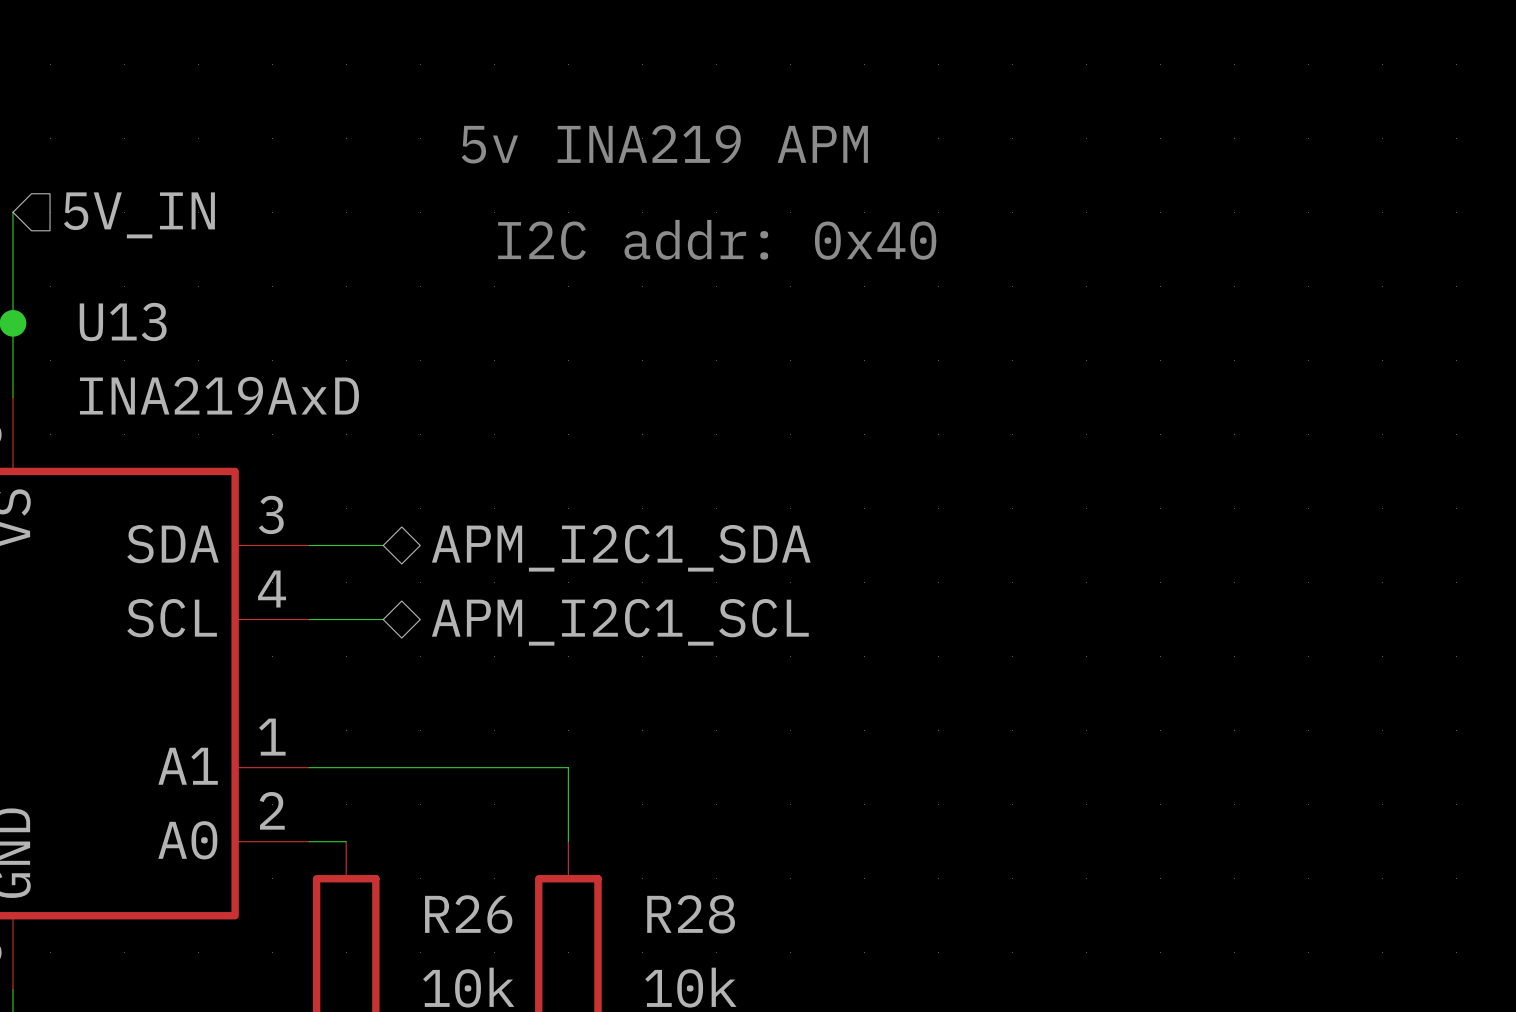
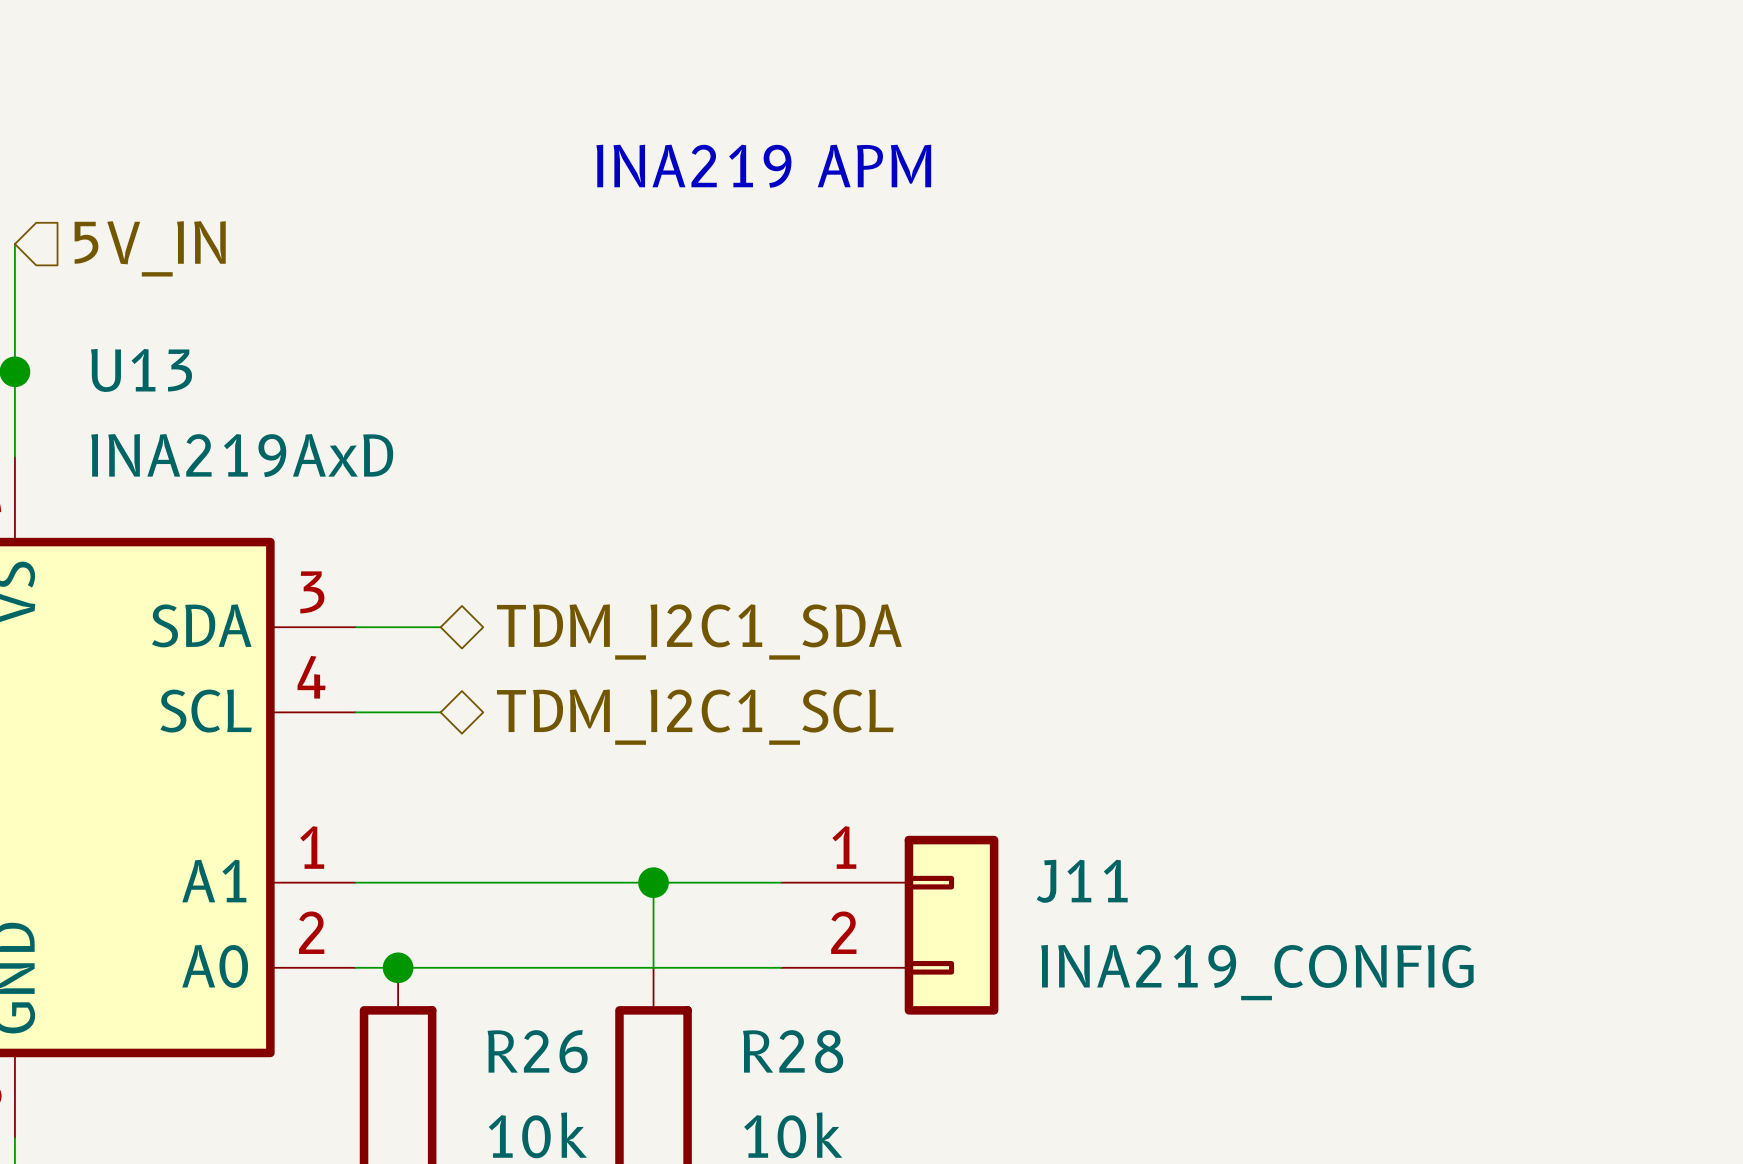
text: 5v INA219 APM (664, 144) -> INA219 APM (763, 166)
text: I2C addr: 0x40 (717, 239) -> none
hierarchical label: APM_I2C1_SDA (621, 548) -> TDM_I2C1_SDA (699, 632)
hierarchical label: APM_I2C1_SCL (620, 622) -> TDM_I2C1_SCL (695, 717)
wire: none -> (653, 882) (781, 882)
junction: none -> (653, 882)
J11: none -> INA219_CONFIG (889, 925)
wire: none -> (398, 967) (781, 967)
junction: none -> (398, 967)

